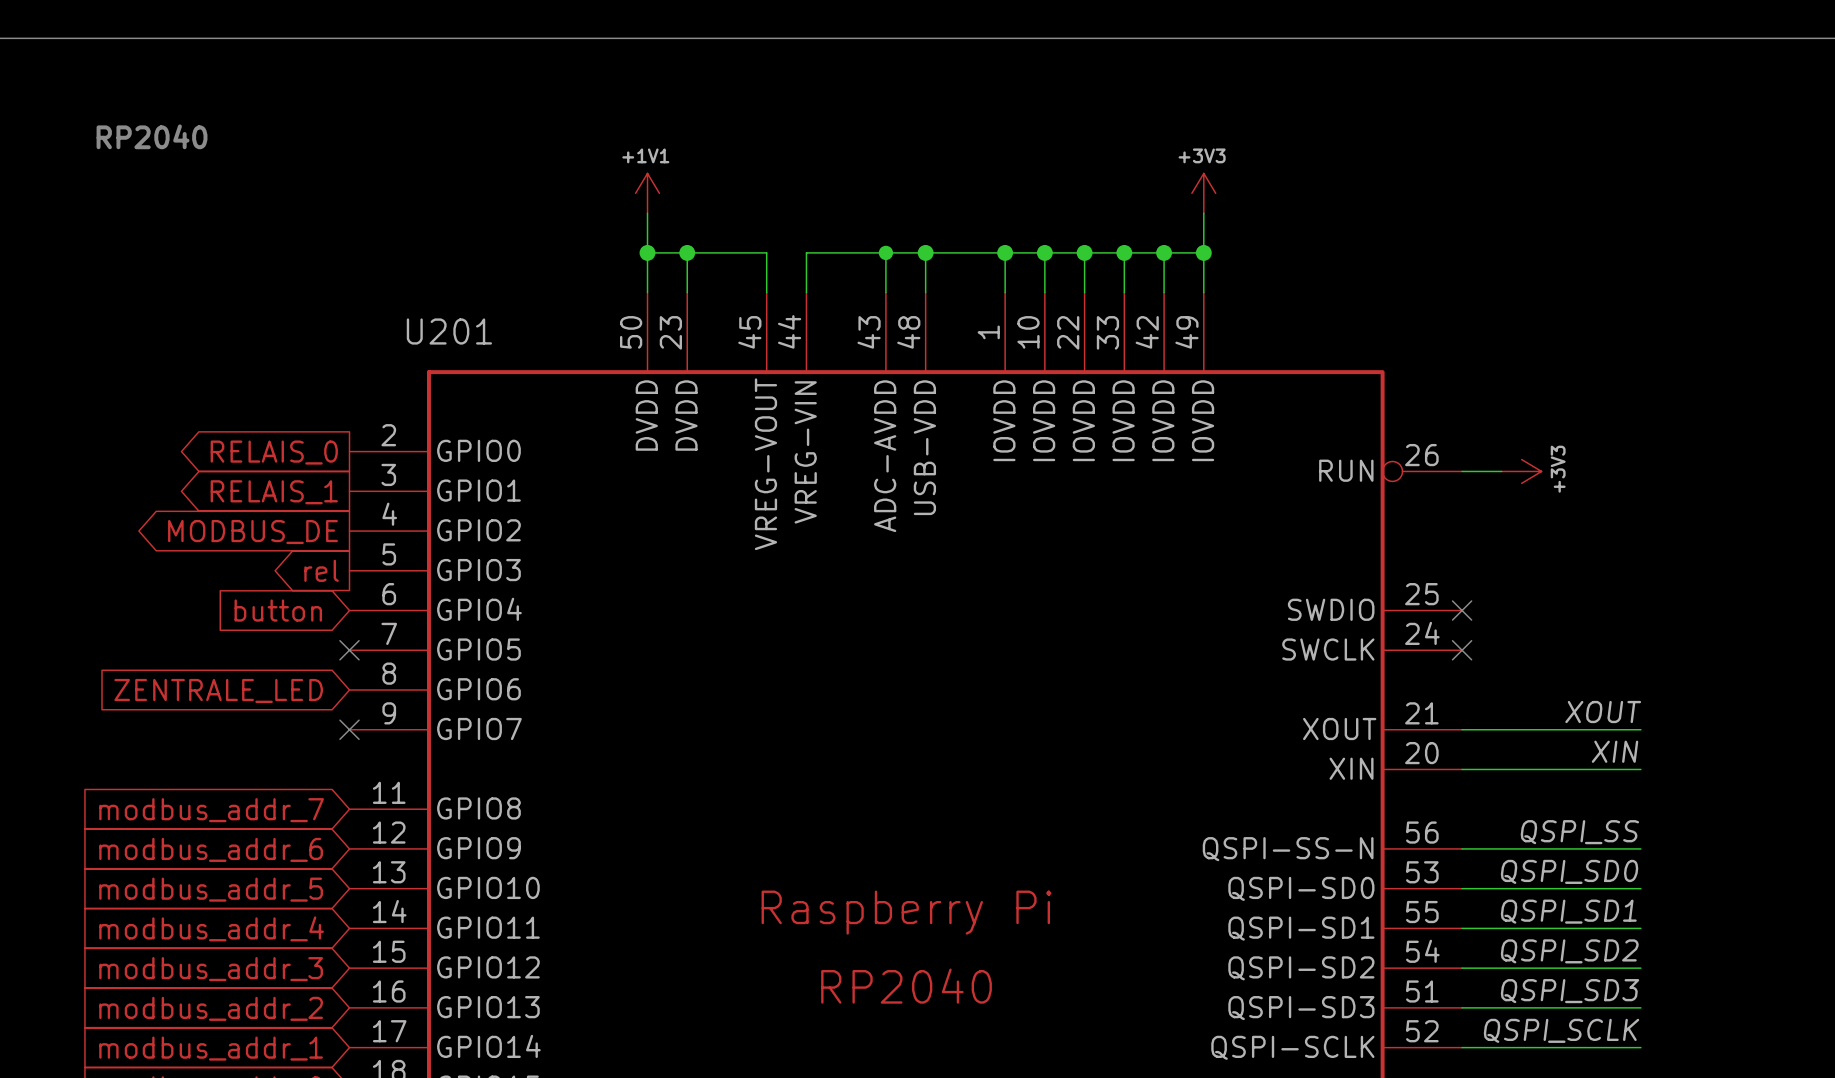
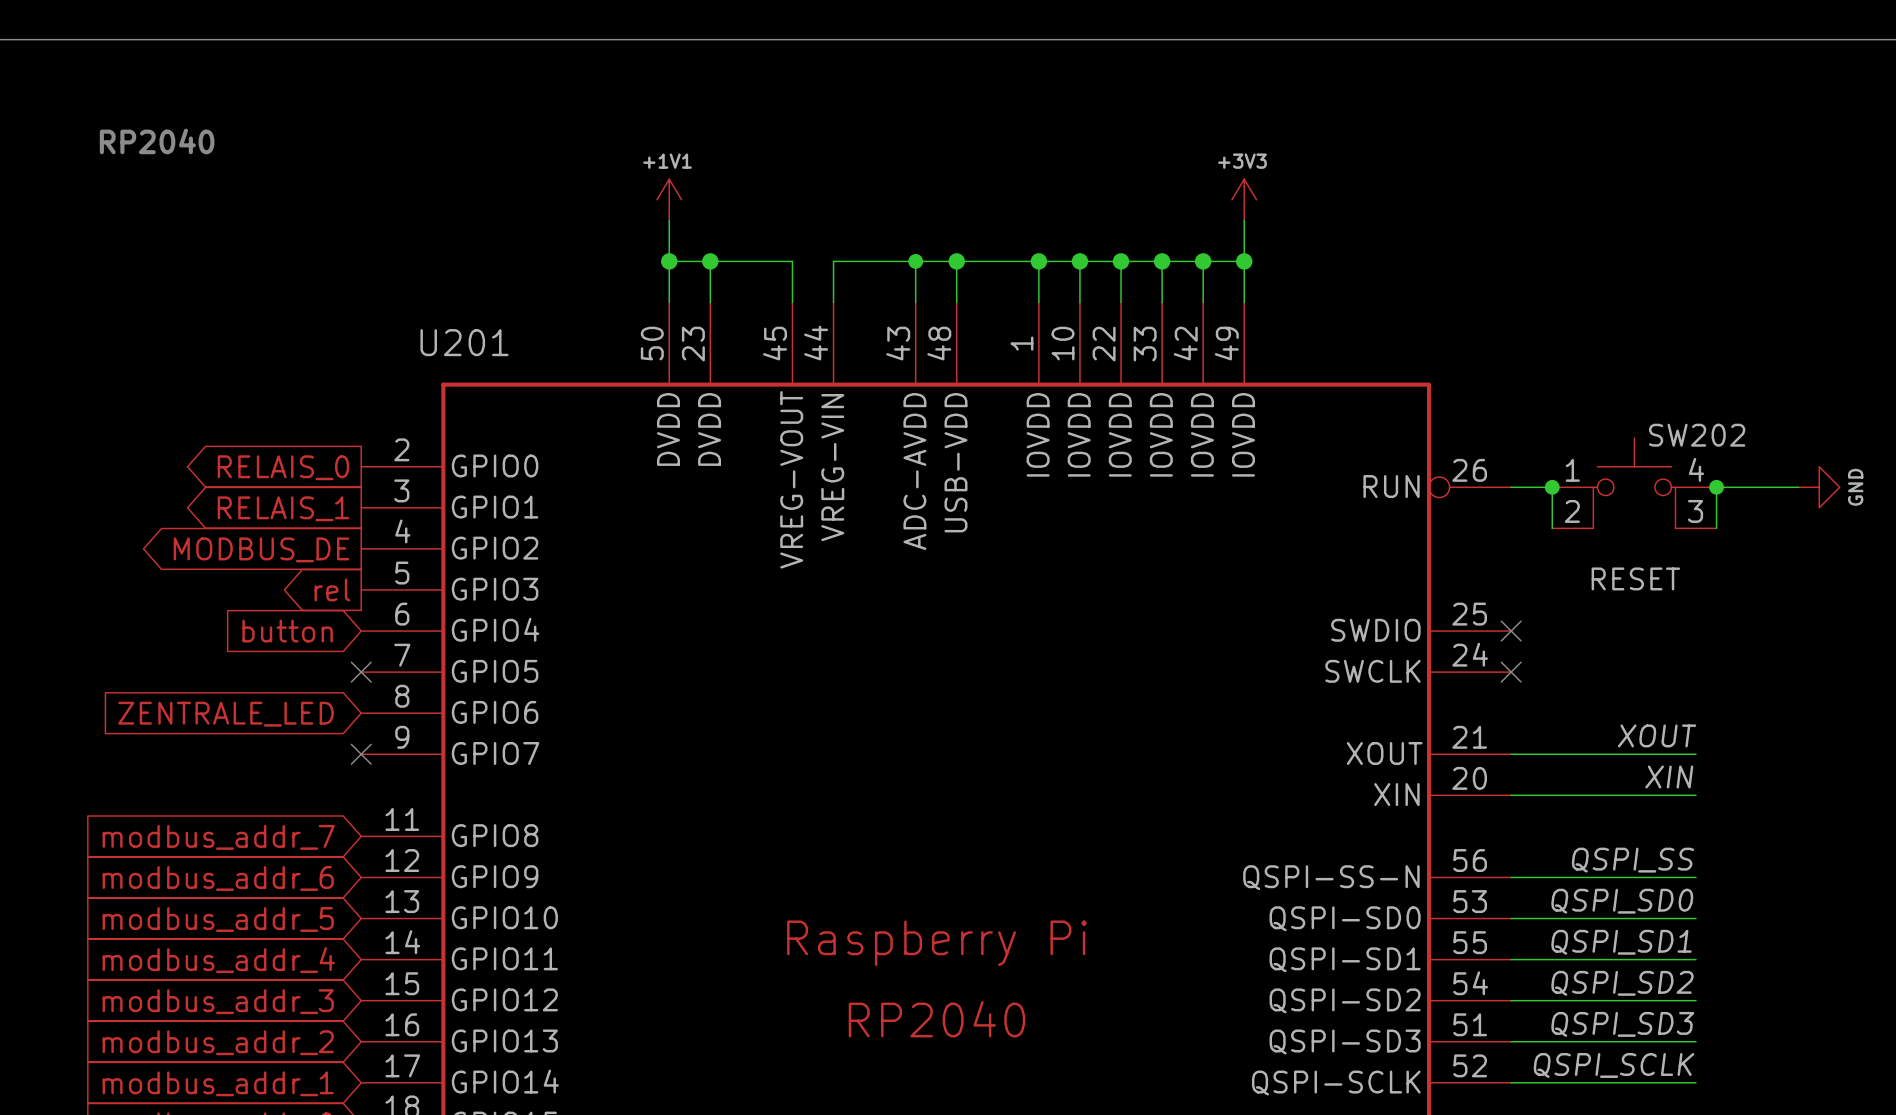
SW202: none -> RESET (1634, 483)
wire: none -> (1552, 487) (1552, 528)
junction: none -> (1552, 487)
power symbol: +3V3 (1521, 471) -> none
junction: none -> (1716, 487)
wire: none -> (1798, 487) (1716, 487) (1716, 528)
power symbol: none -> GND (1819, 487)

